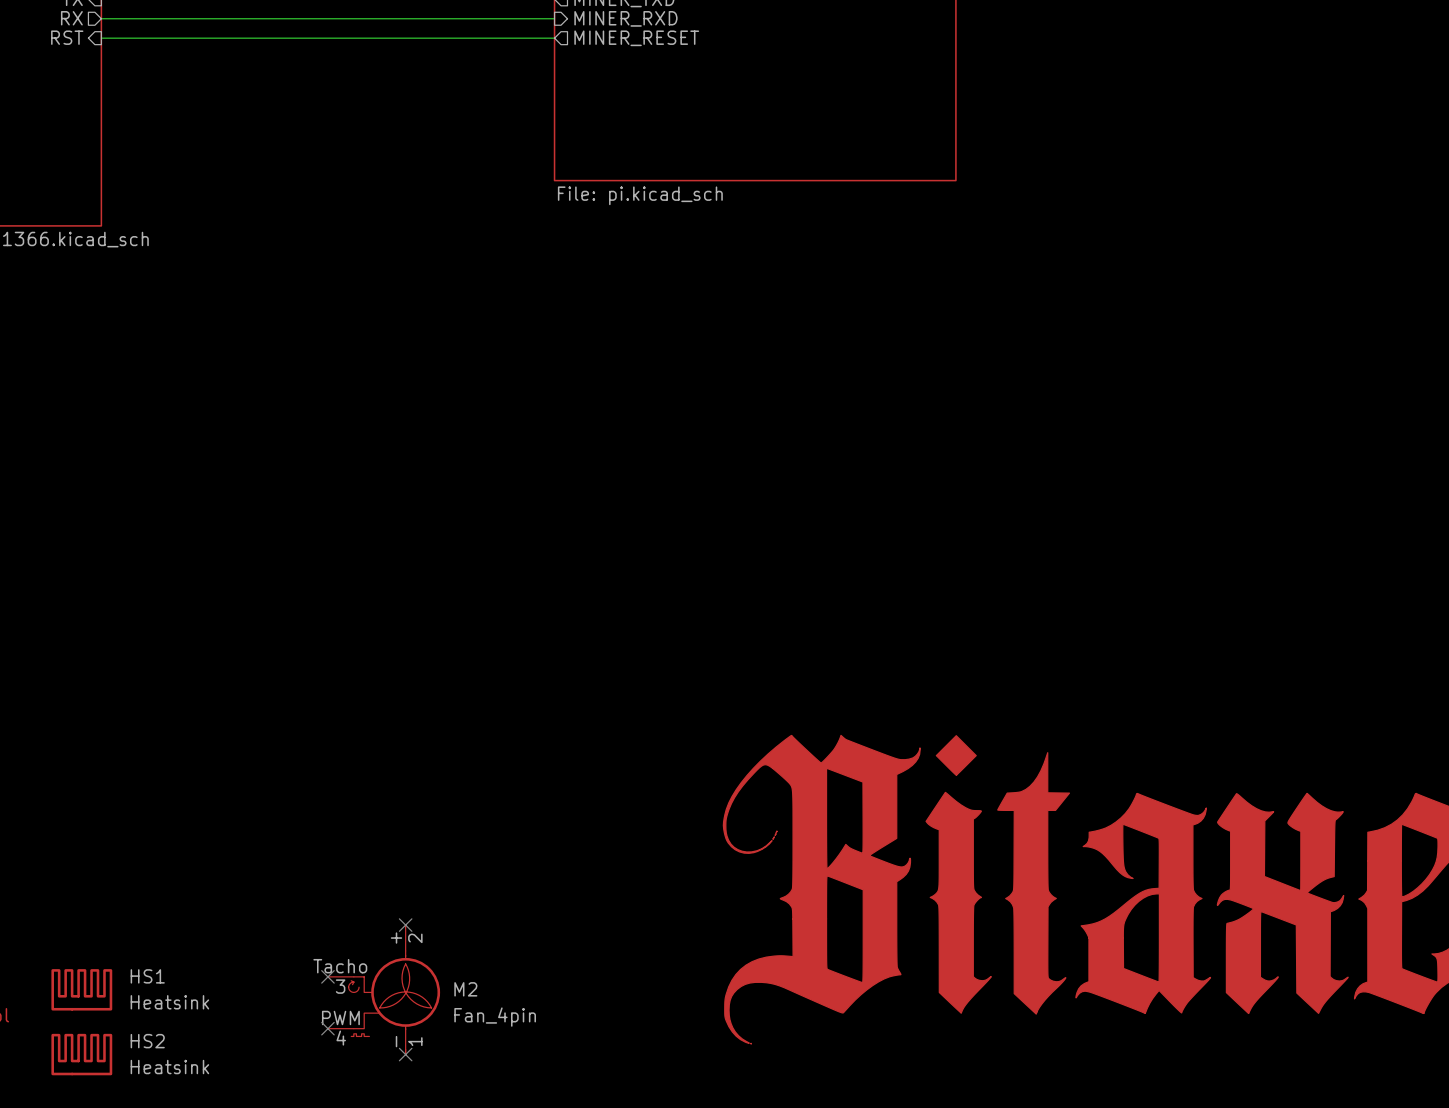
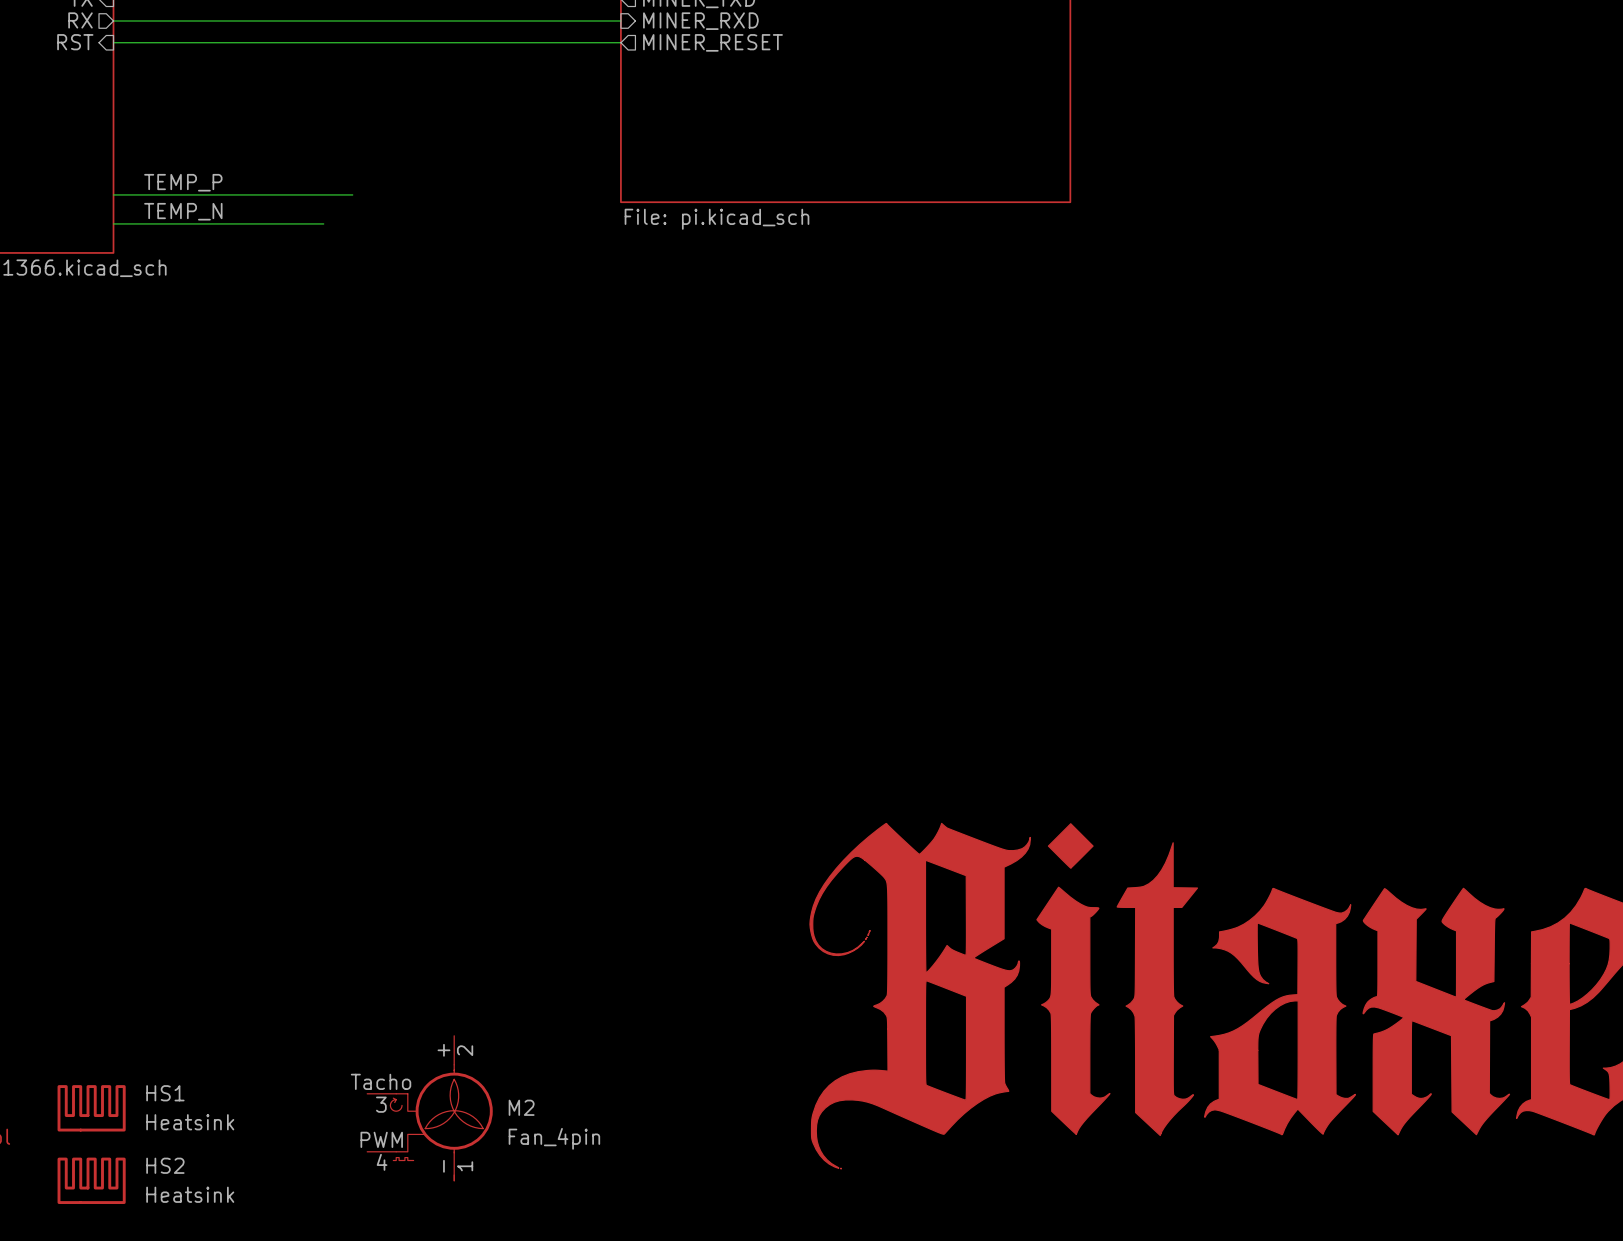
label: none -> TEMP_P (183, 182)
wire: none -> (113, 194) (352, 194)
label: none -> TEMP_N (183, 211)
wire: none -> (113, 223) (323, 223)
no-connect mark: (405, 925) -> none
no-connect mark: (327, 976) -> none
no-connect mark: (327, 1028) -> none
no-connect mark: (405, 1054) -> none

